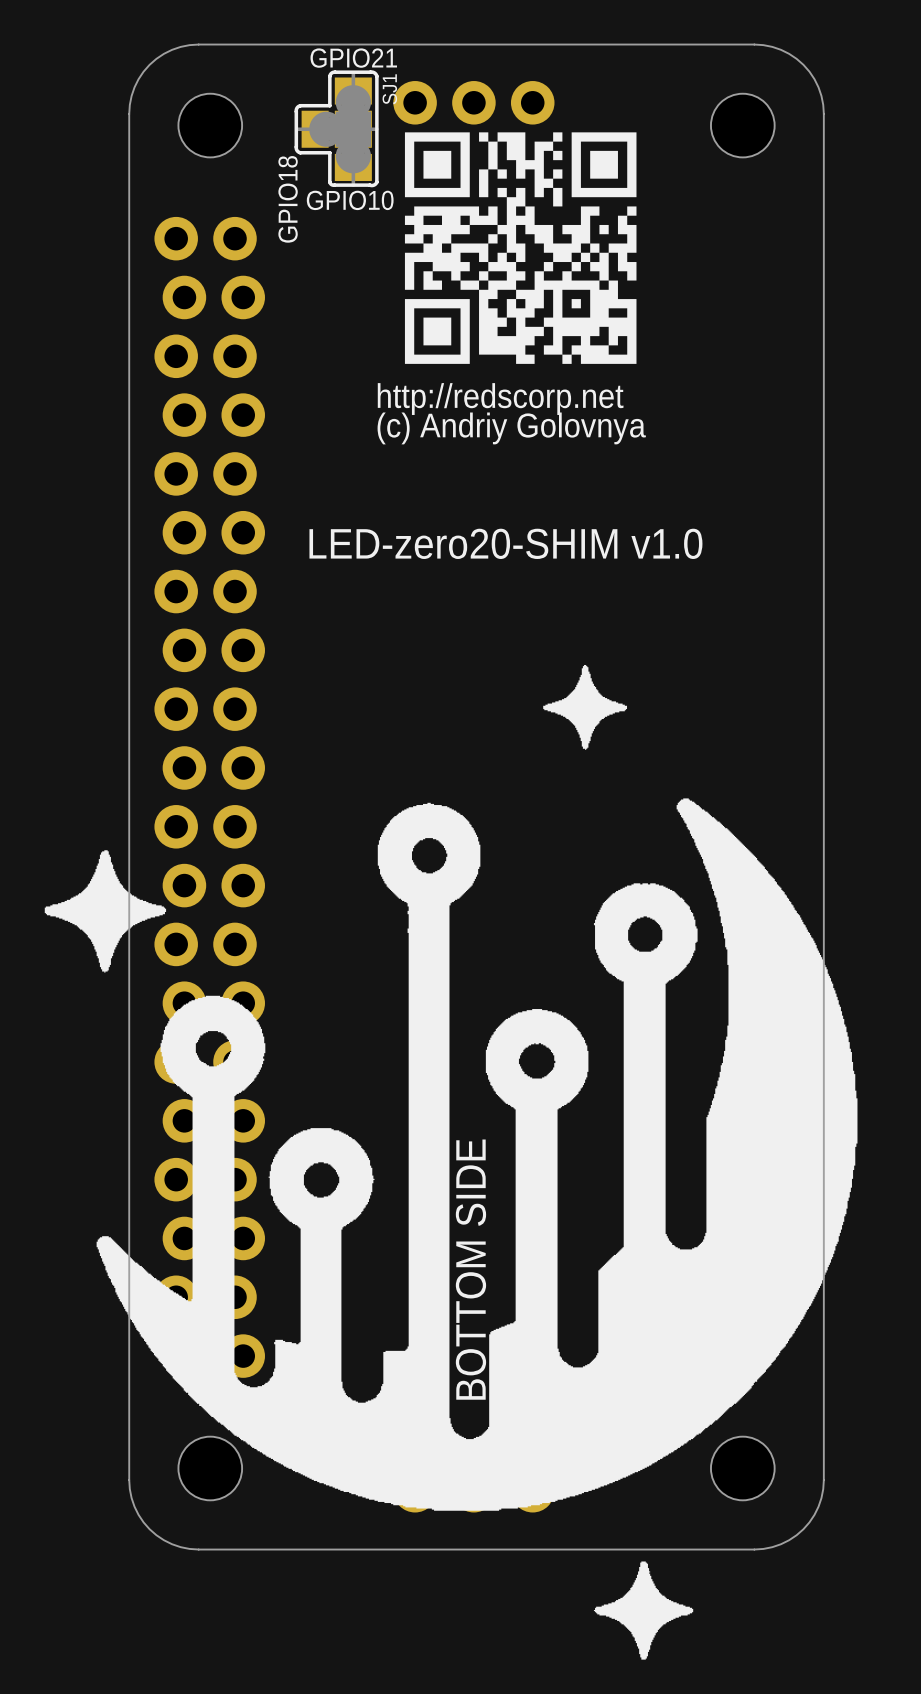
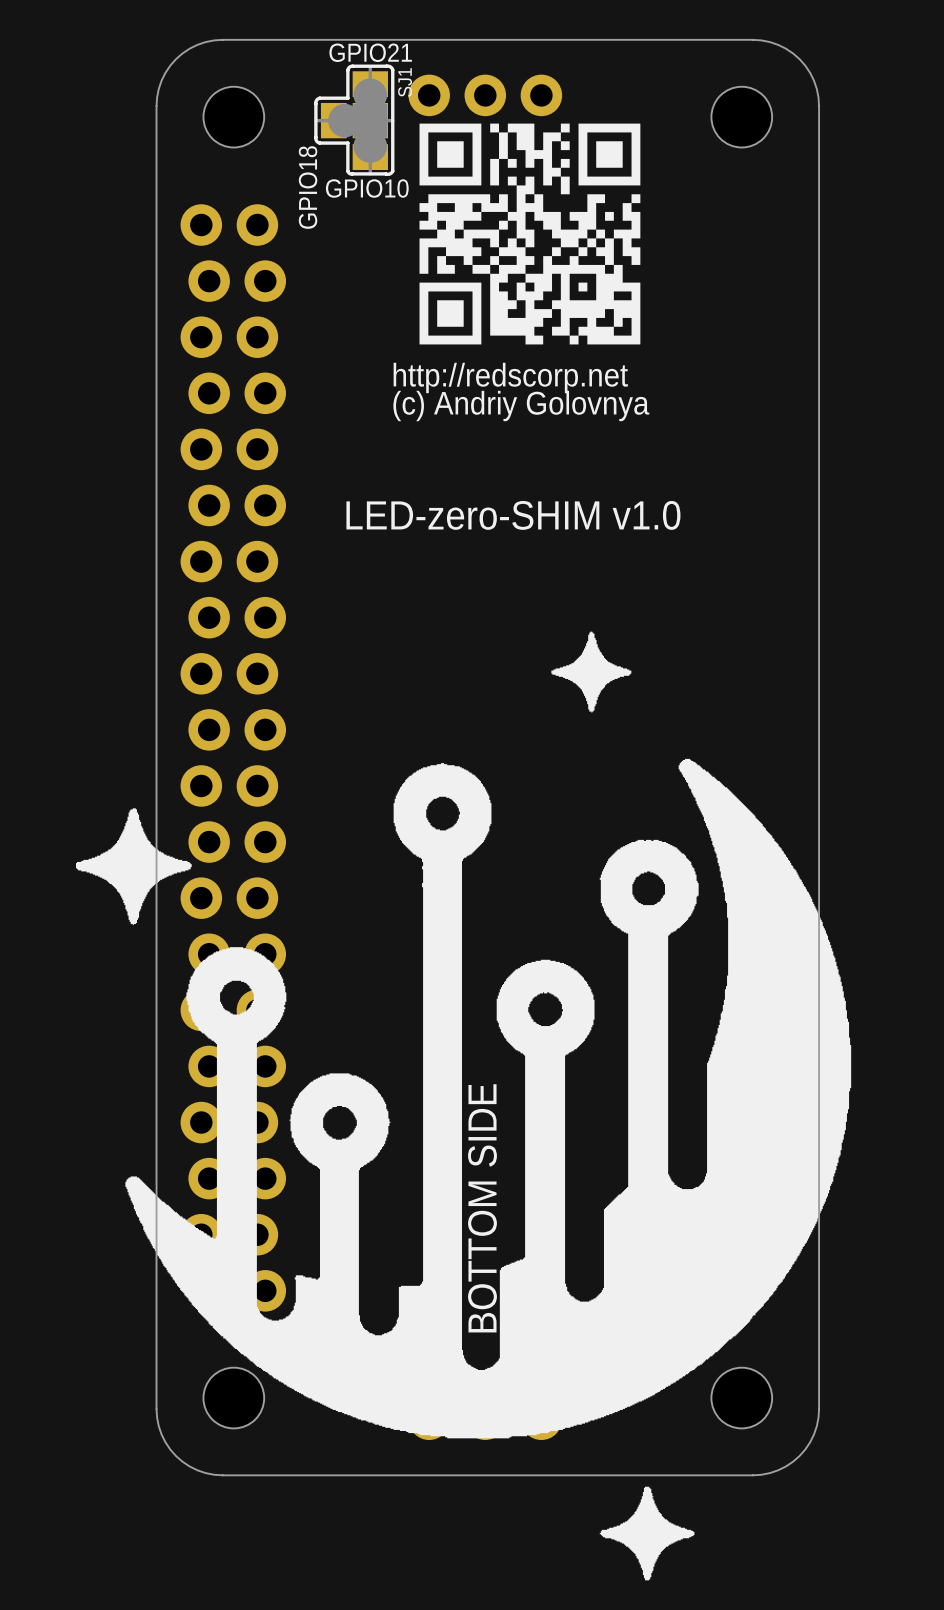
text: LED-zero20-SHIM v1.0 (505, 543) -> LED-zero-SHIM v1.0 (513, 515)

